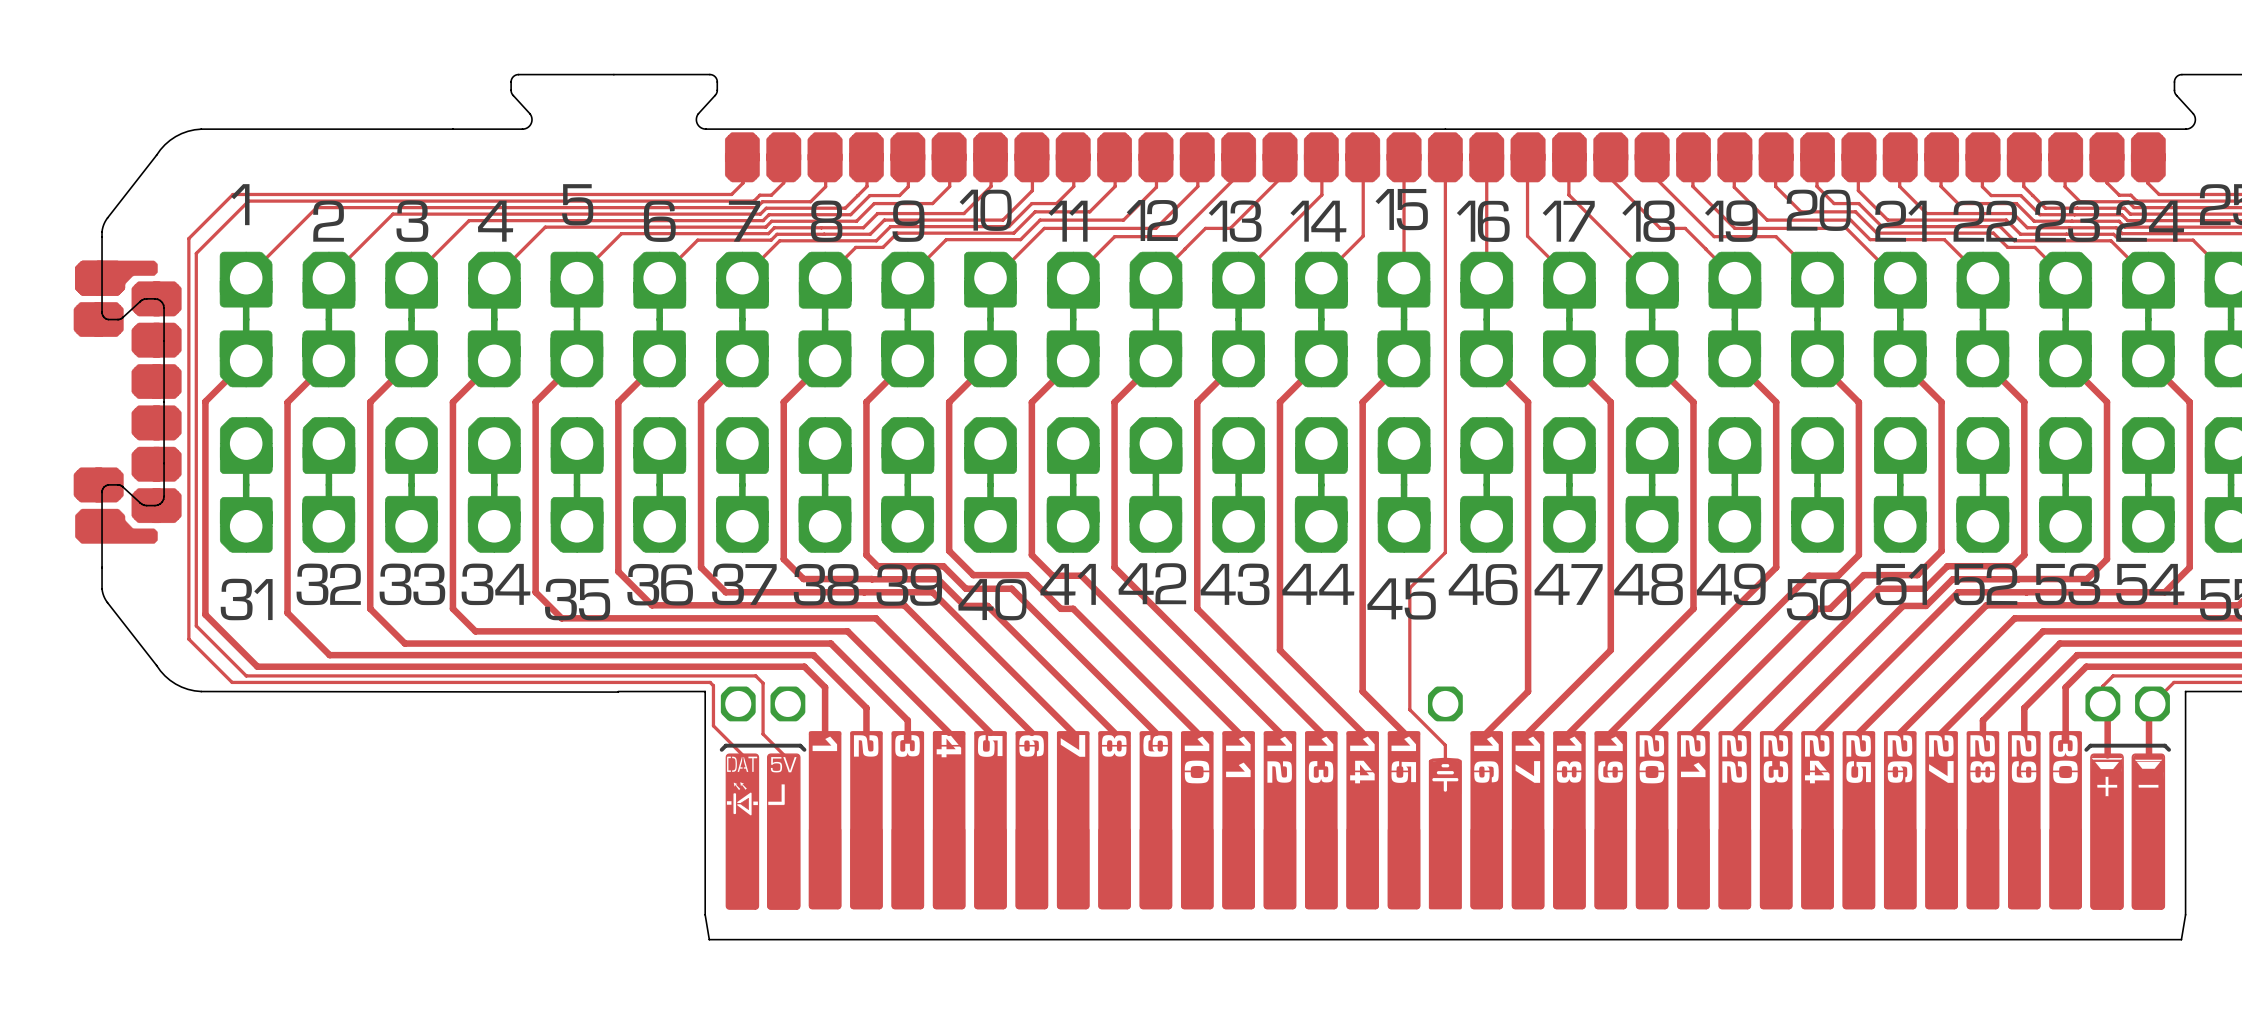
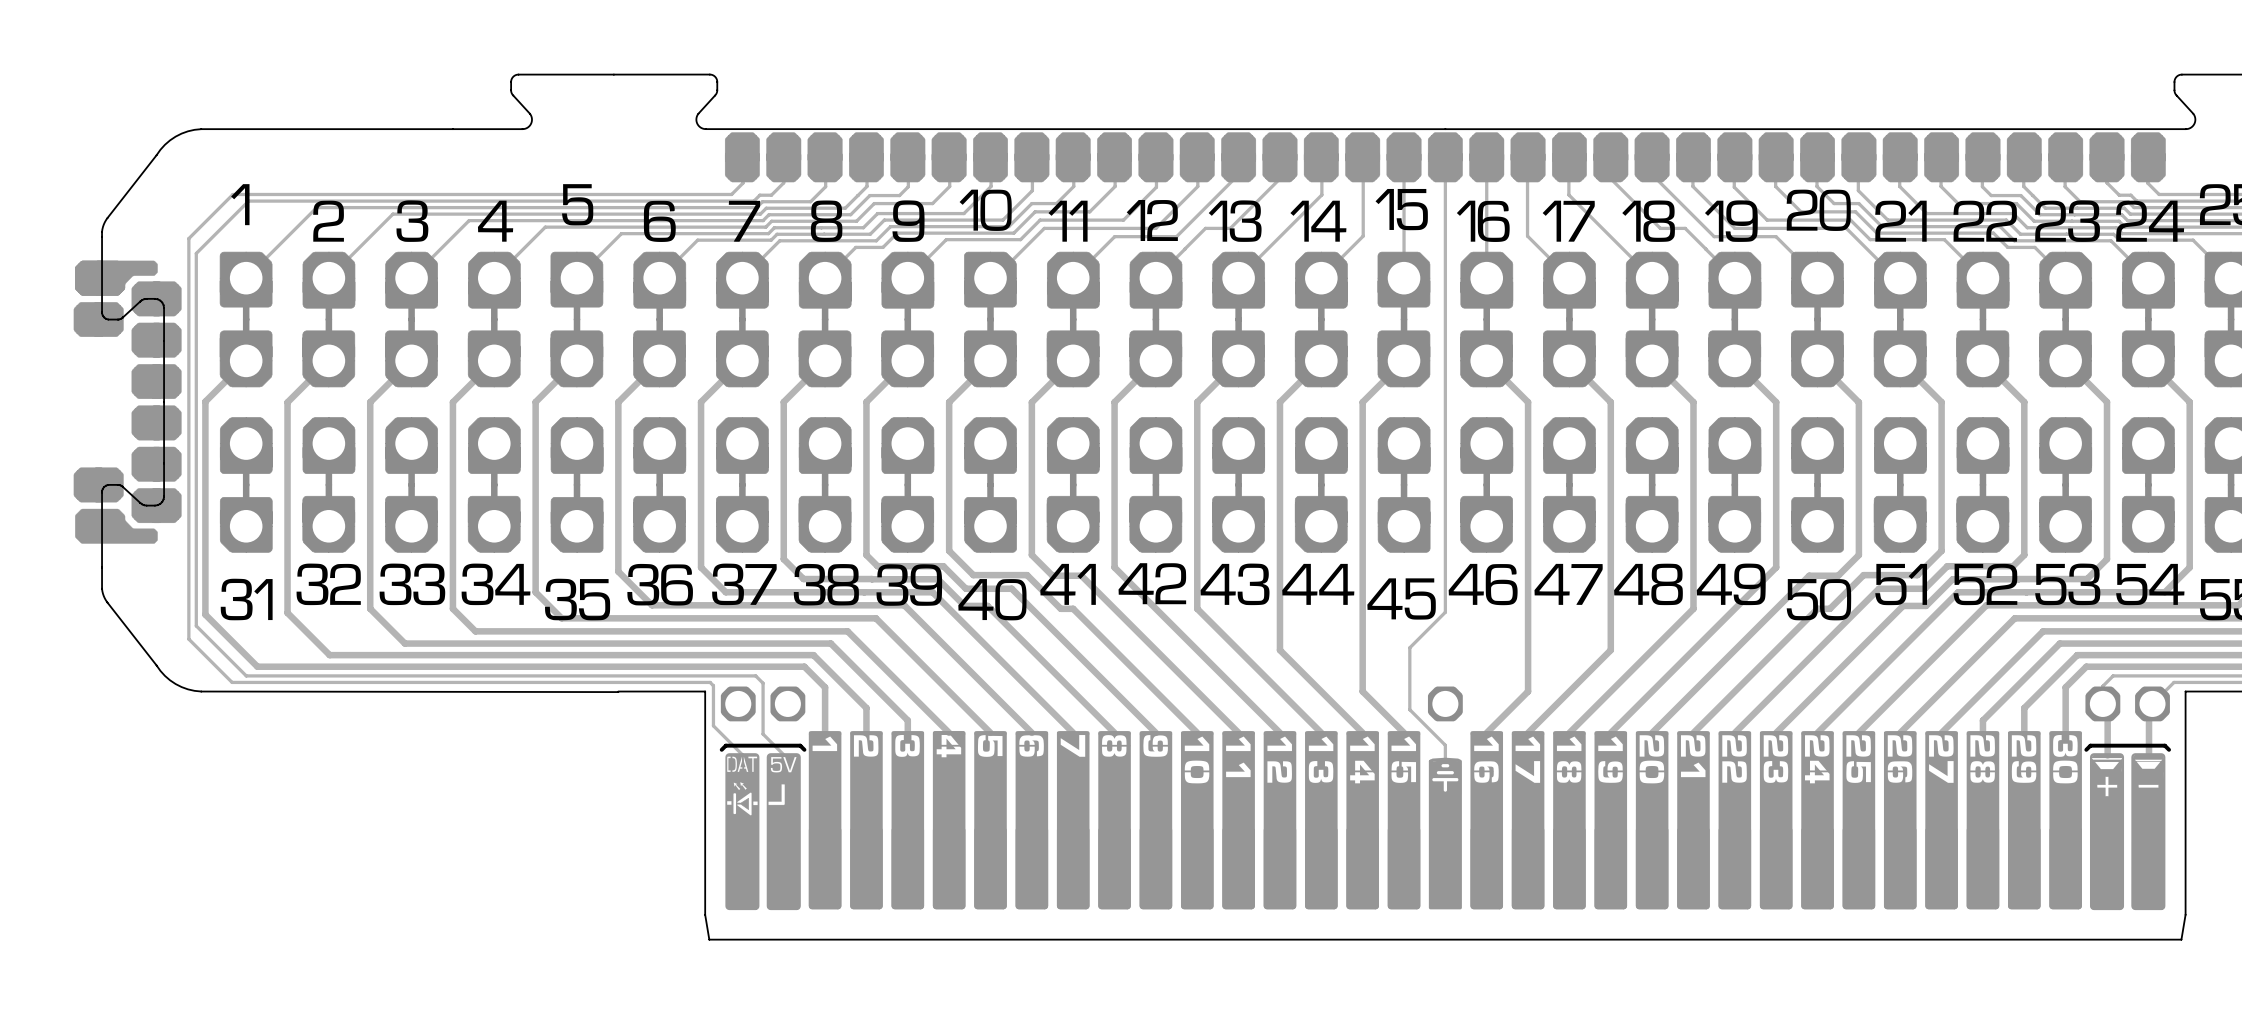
track: (1445, 552) (1409, 588) (1409, 647) -> (1445, 552) (1445, 612) (1409, 647)

